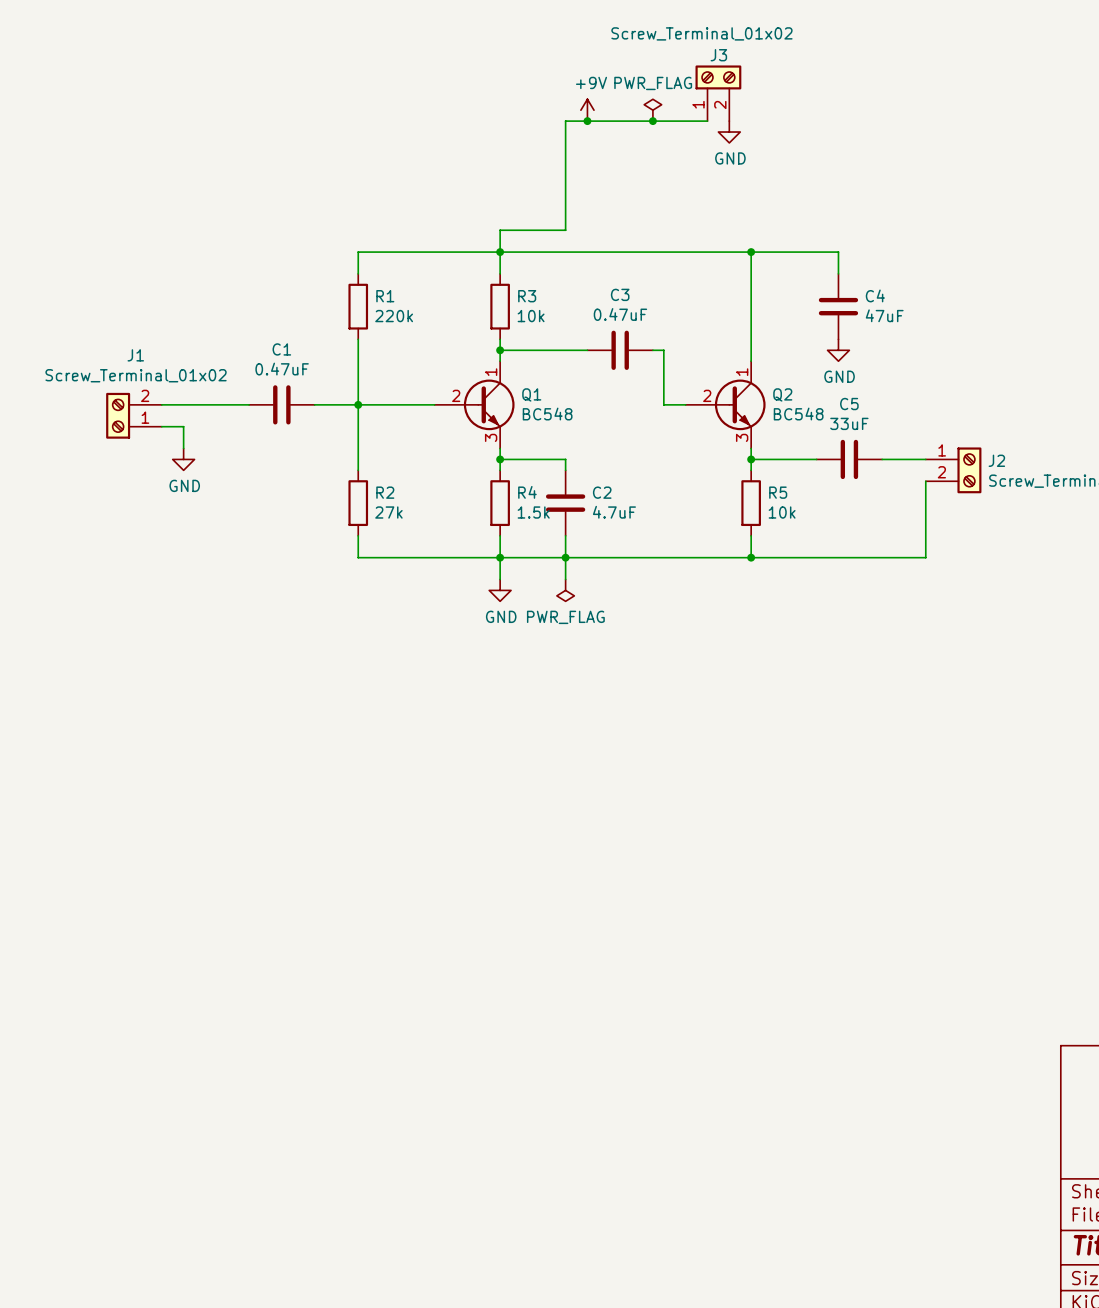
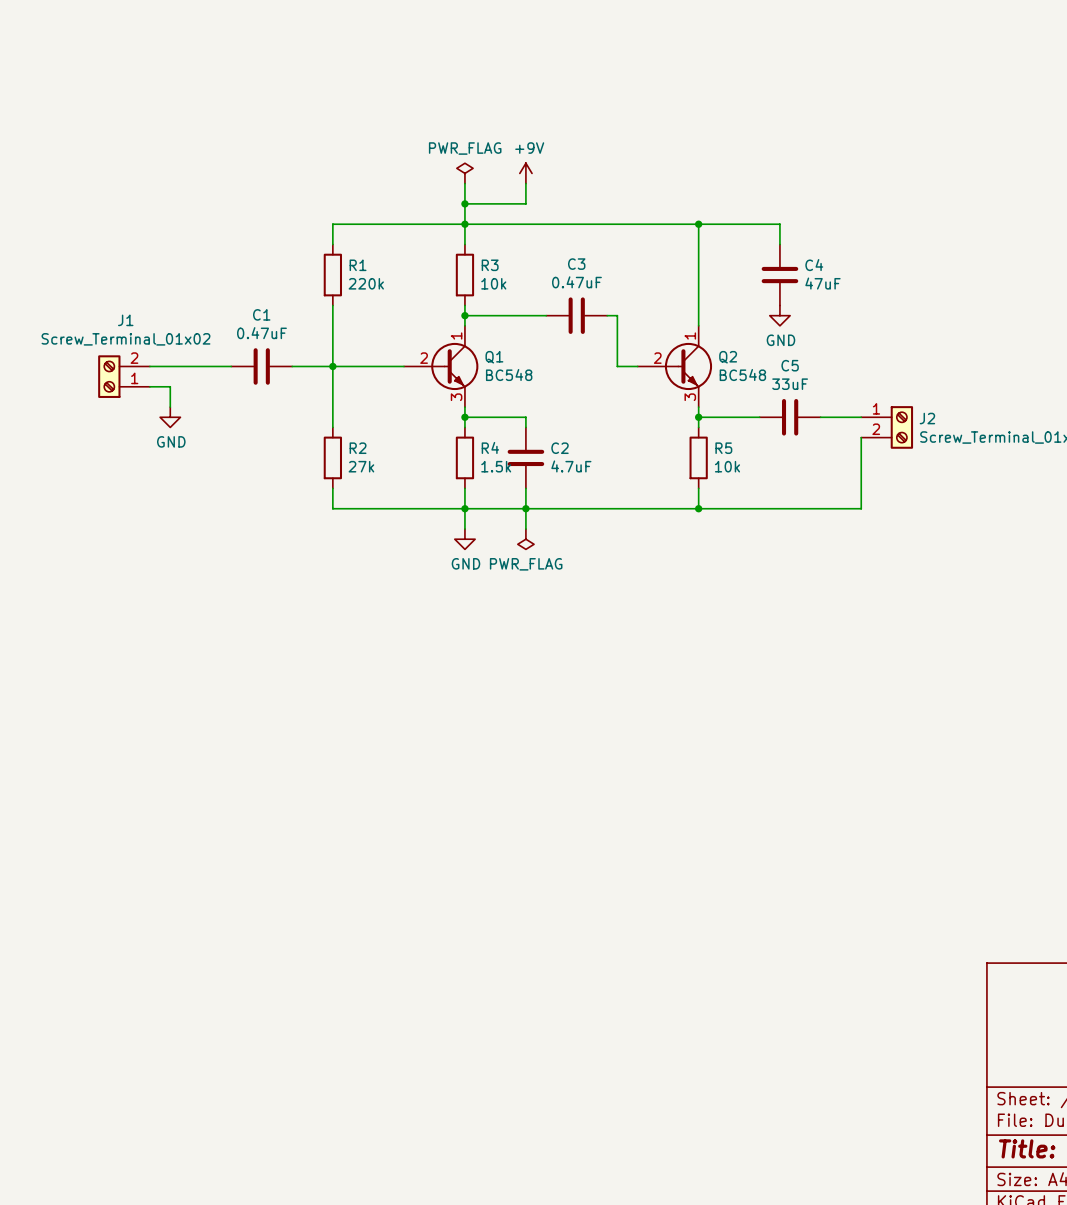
J3: Screw_Terminal_01x02 (718, 93) -> none
power symbol position: +9V (587, 110) -> +9V (525, 173)
power symbol position: PWR_FLAG (652, 110) -> PWR_FLAG (464, 173)
junction: (587, 121) -> none
junction: (652, 121) -> none
wire: (707, 121) (565, 121) (565, 208) -> none
power symbol: GND (729, 132) -> none
wire: none -> (464, 183) (464, 203)
junction: none -> (464, 203)

